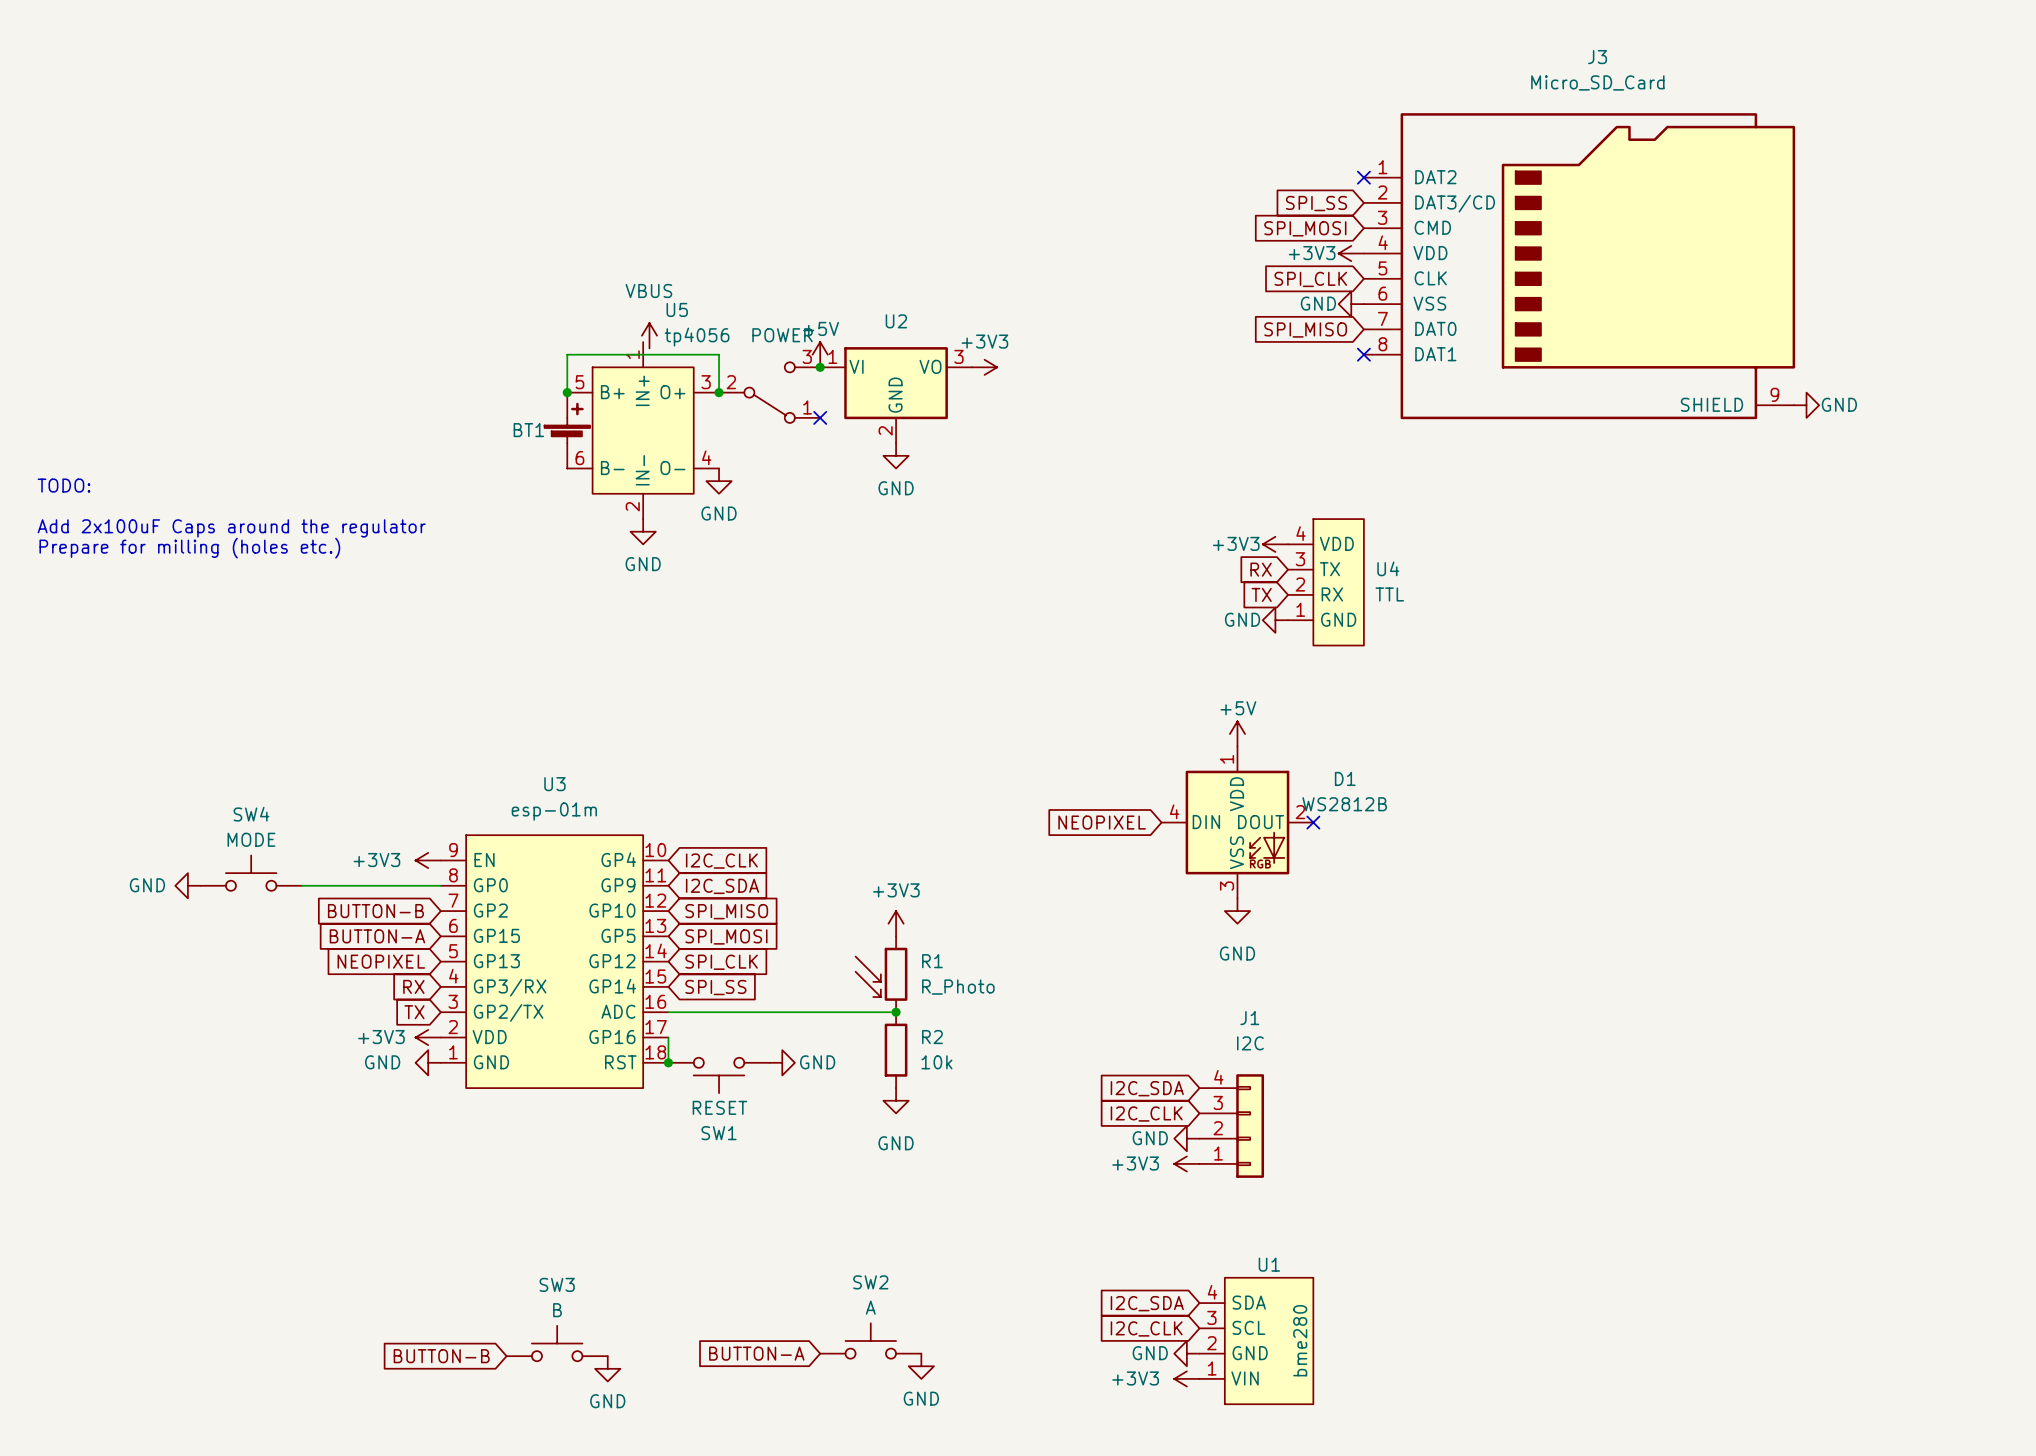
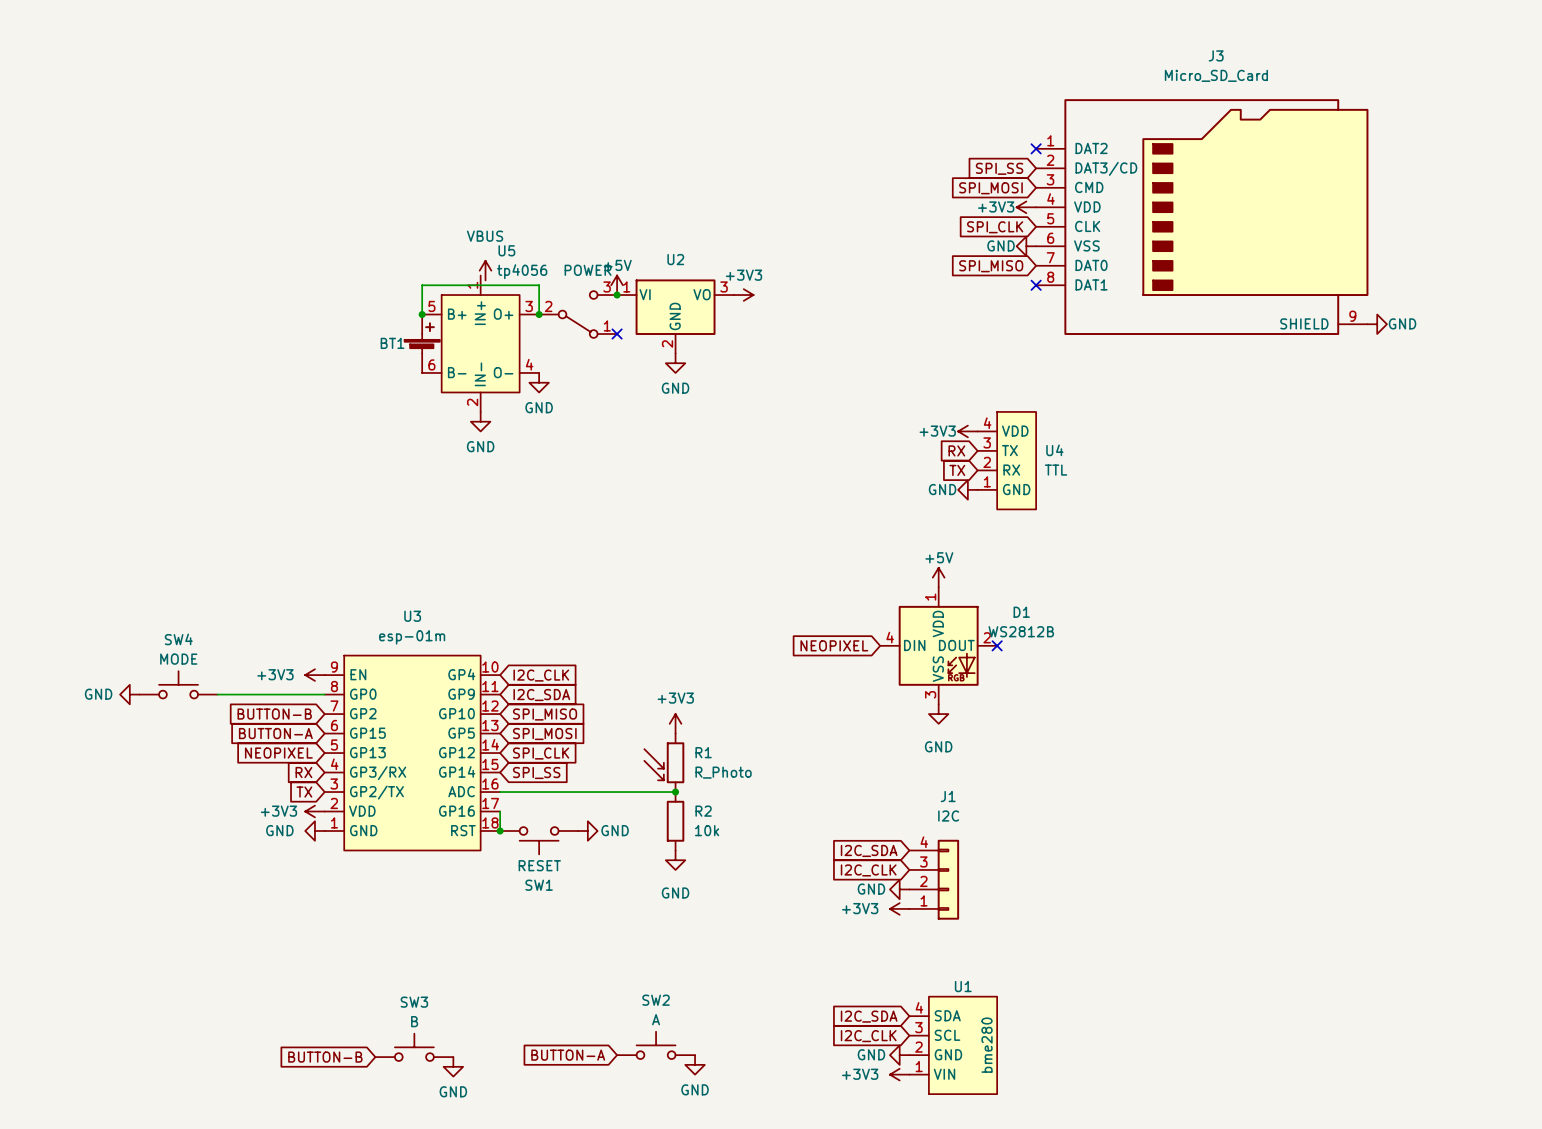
text: TODO: (63, 485) -> none
text: Add 2x100uF Caps around the regulator (231, 528) -> none
text: Prepare for milling (holes etc.) (189, 548) -> none

